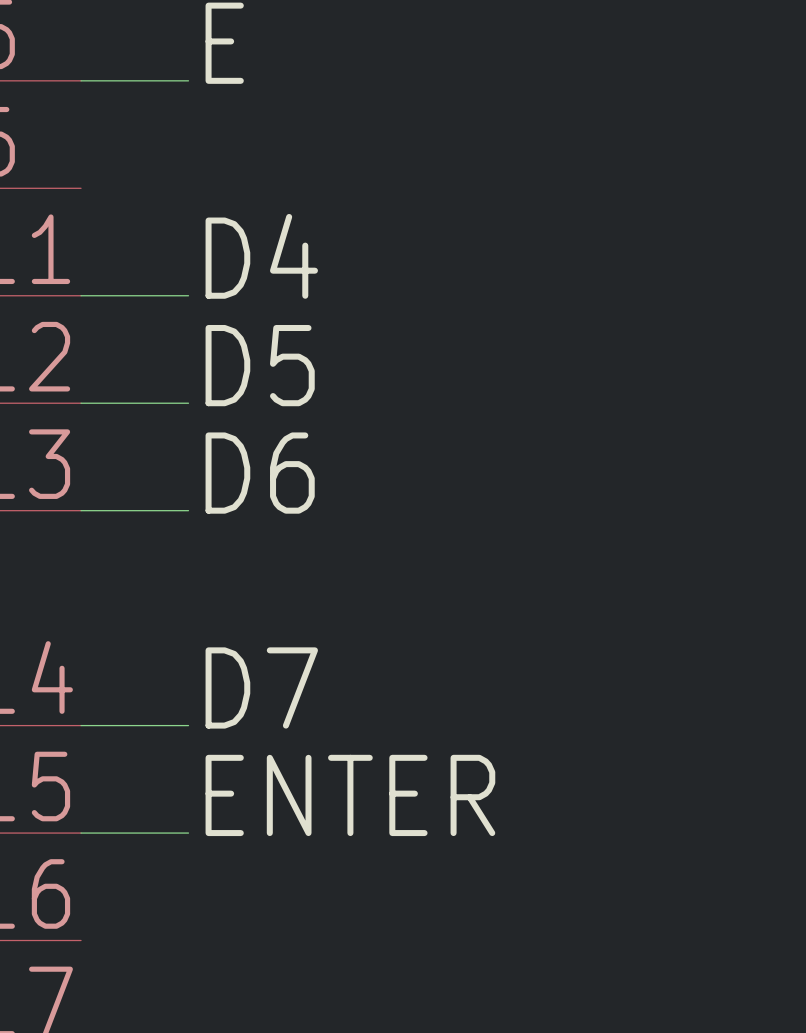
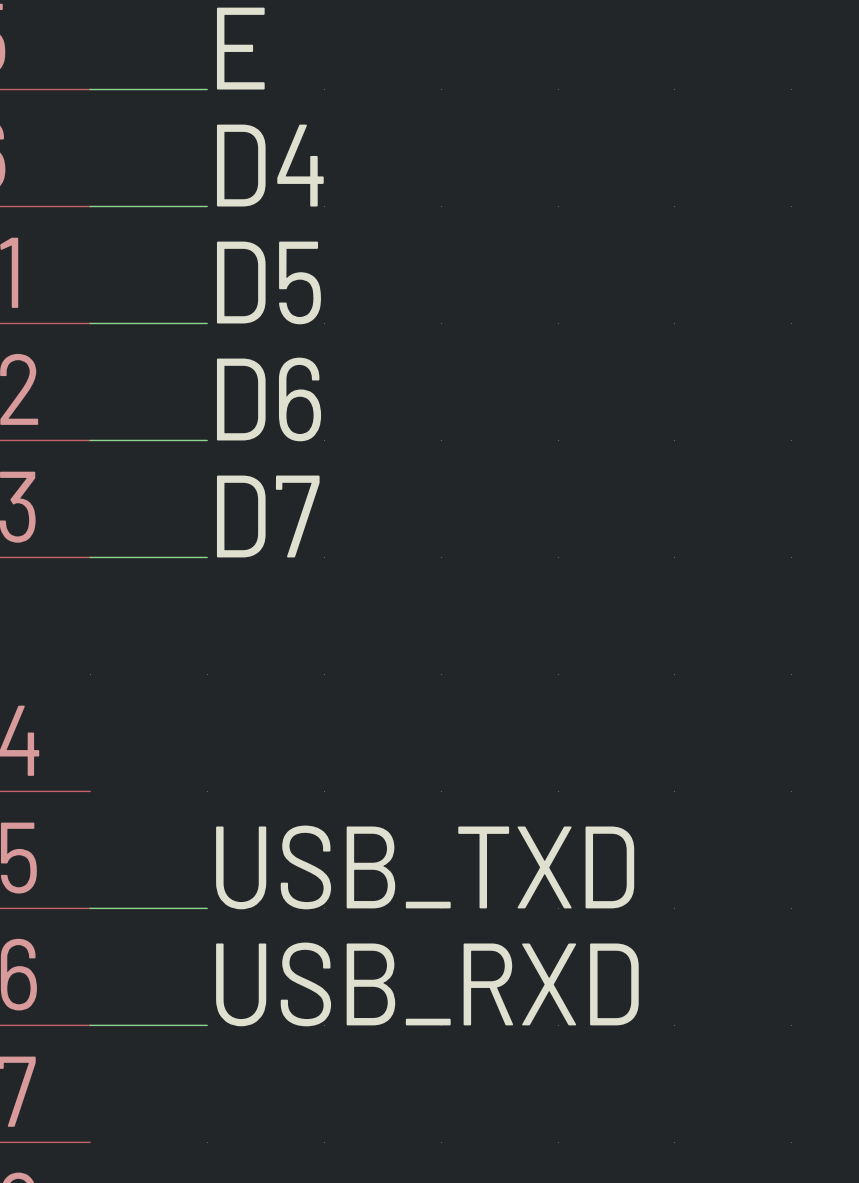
label: none -> D4 (270, 165)
wire: none -> (90, 206) (207, 206)
label: D4 (261, 256) -> D5 (268, 282)
label: D5 (260, 365) -> D6 (269, 399)
label: D6 (260, 473) -> D7 (268, 516)
label: D7 (261, 687) -> none
wire: (81, 725) (188, 725) -> (90, 1025) (207, 1025)
label: ENTER (350, 795) -> USB_TXD (425, 867)
label: none -> USB_RXD (427, 984)

